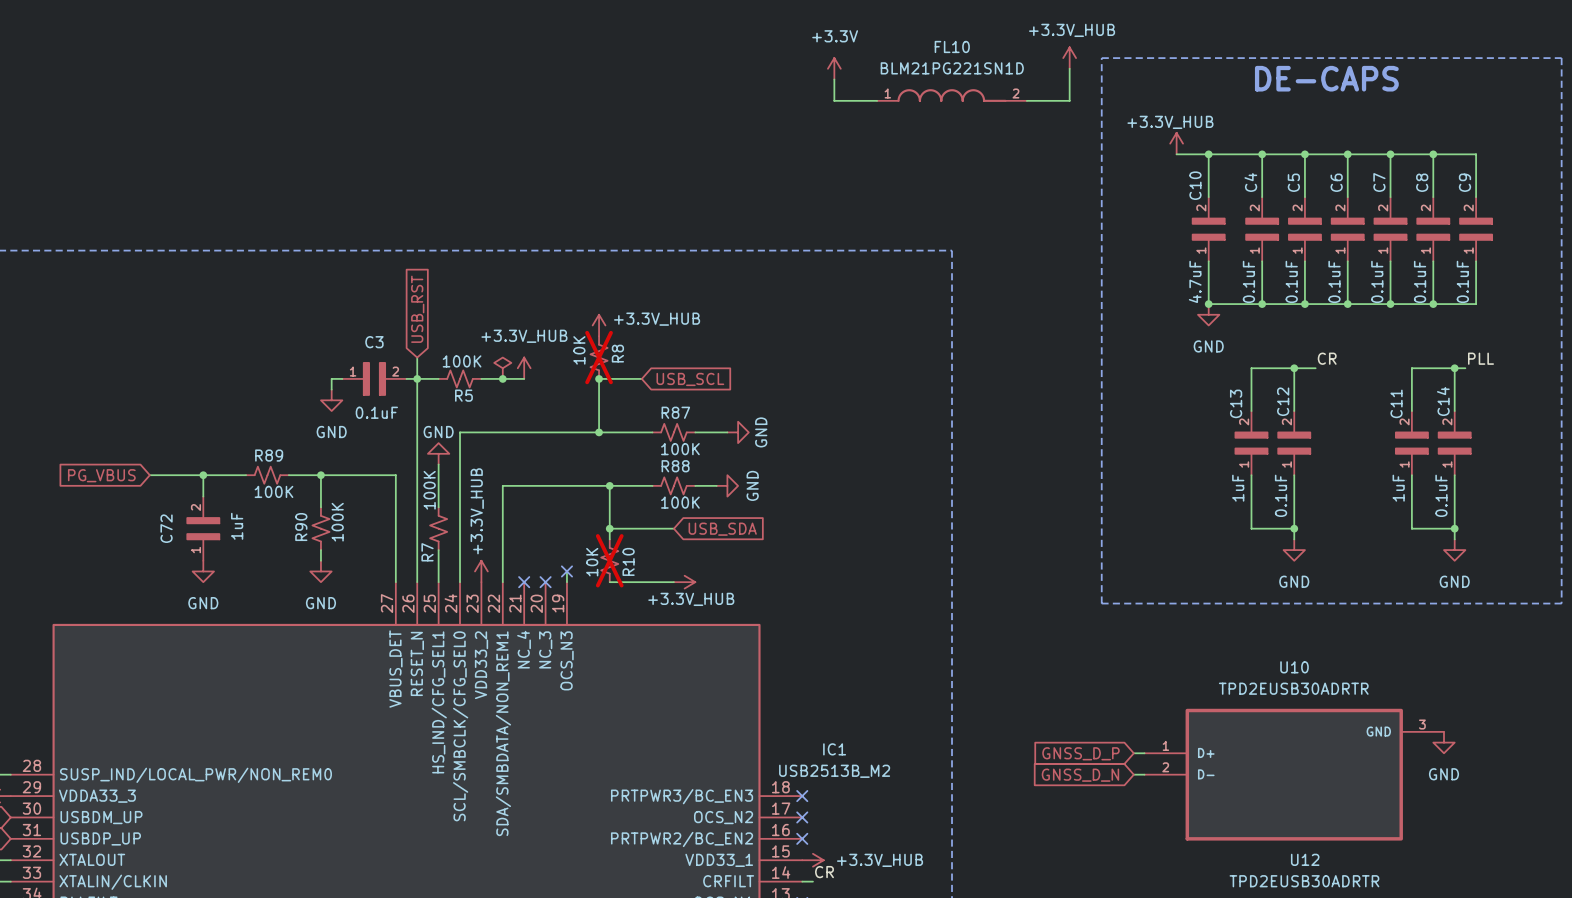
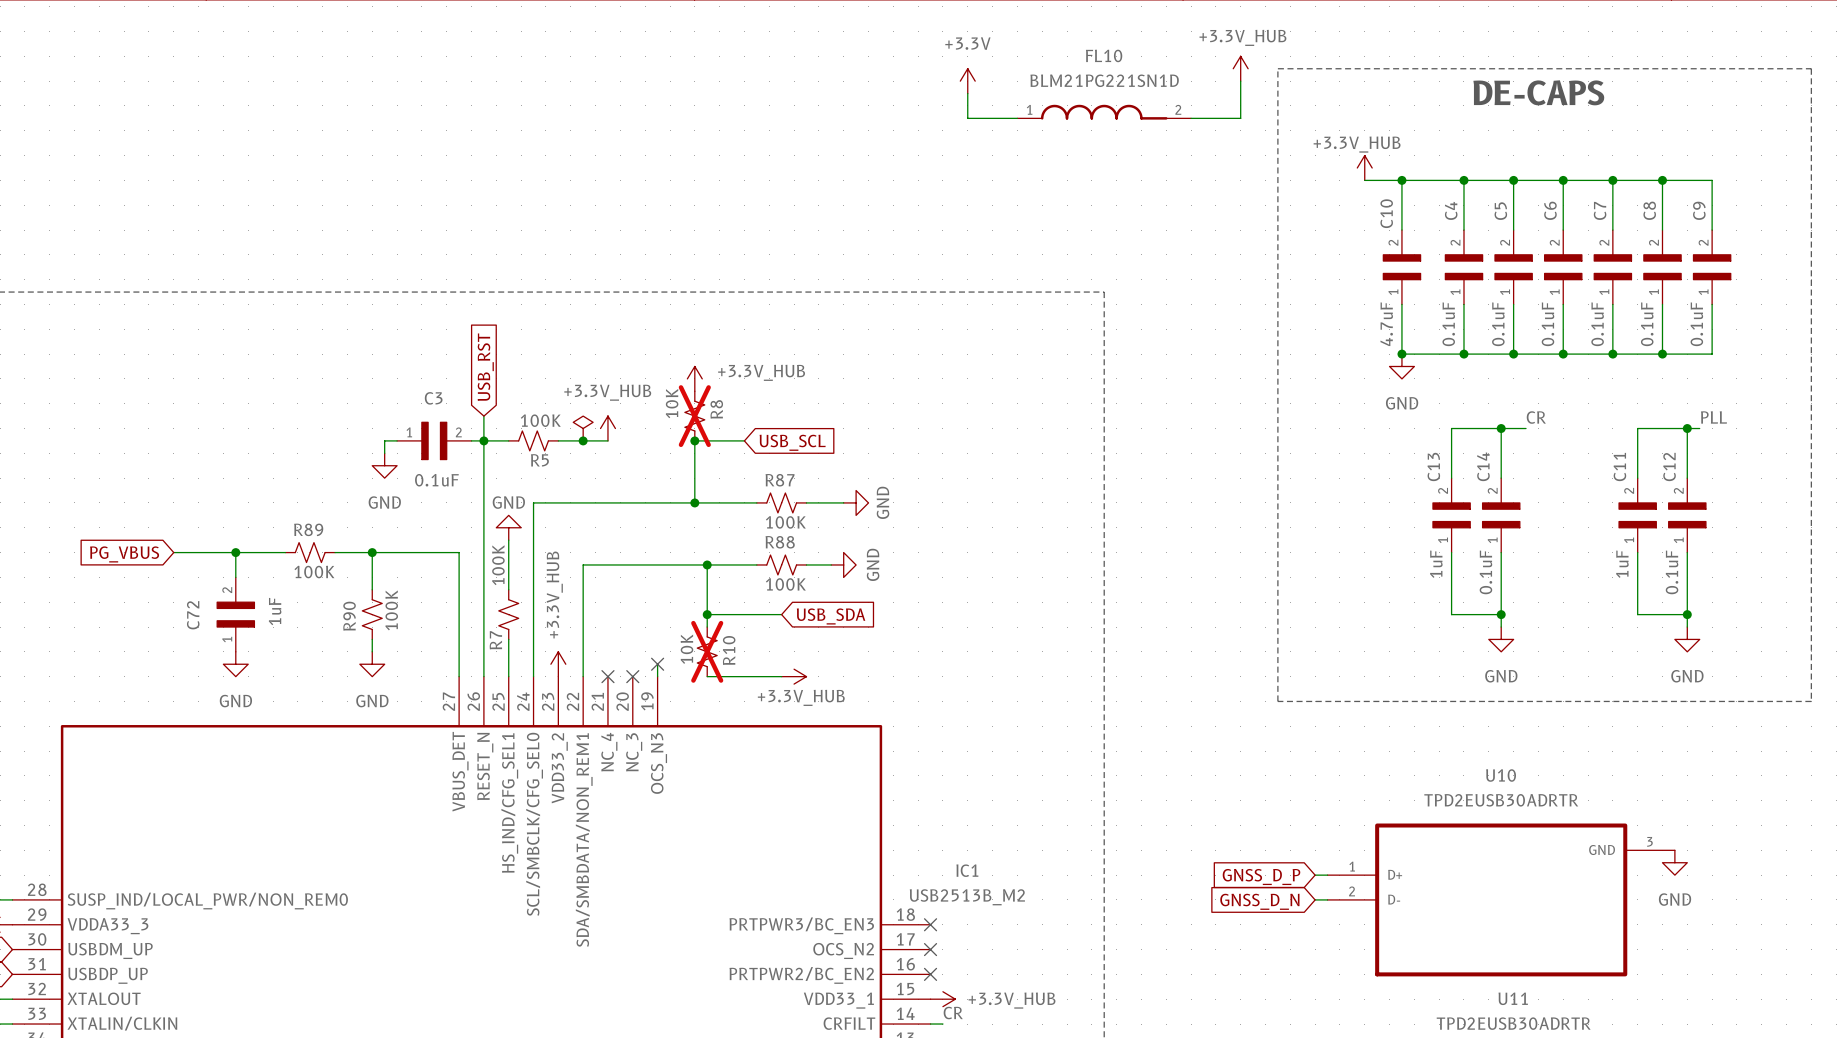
C12 name: C12 (1283, 401) -> C14 (1483, 466)
C14 name: C14 (1443, 401) -> C12 (1669, 466)
U12 name: U12 (1305, 859) -> U11 (1513, 998)

